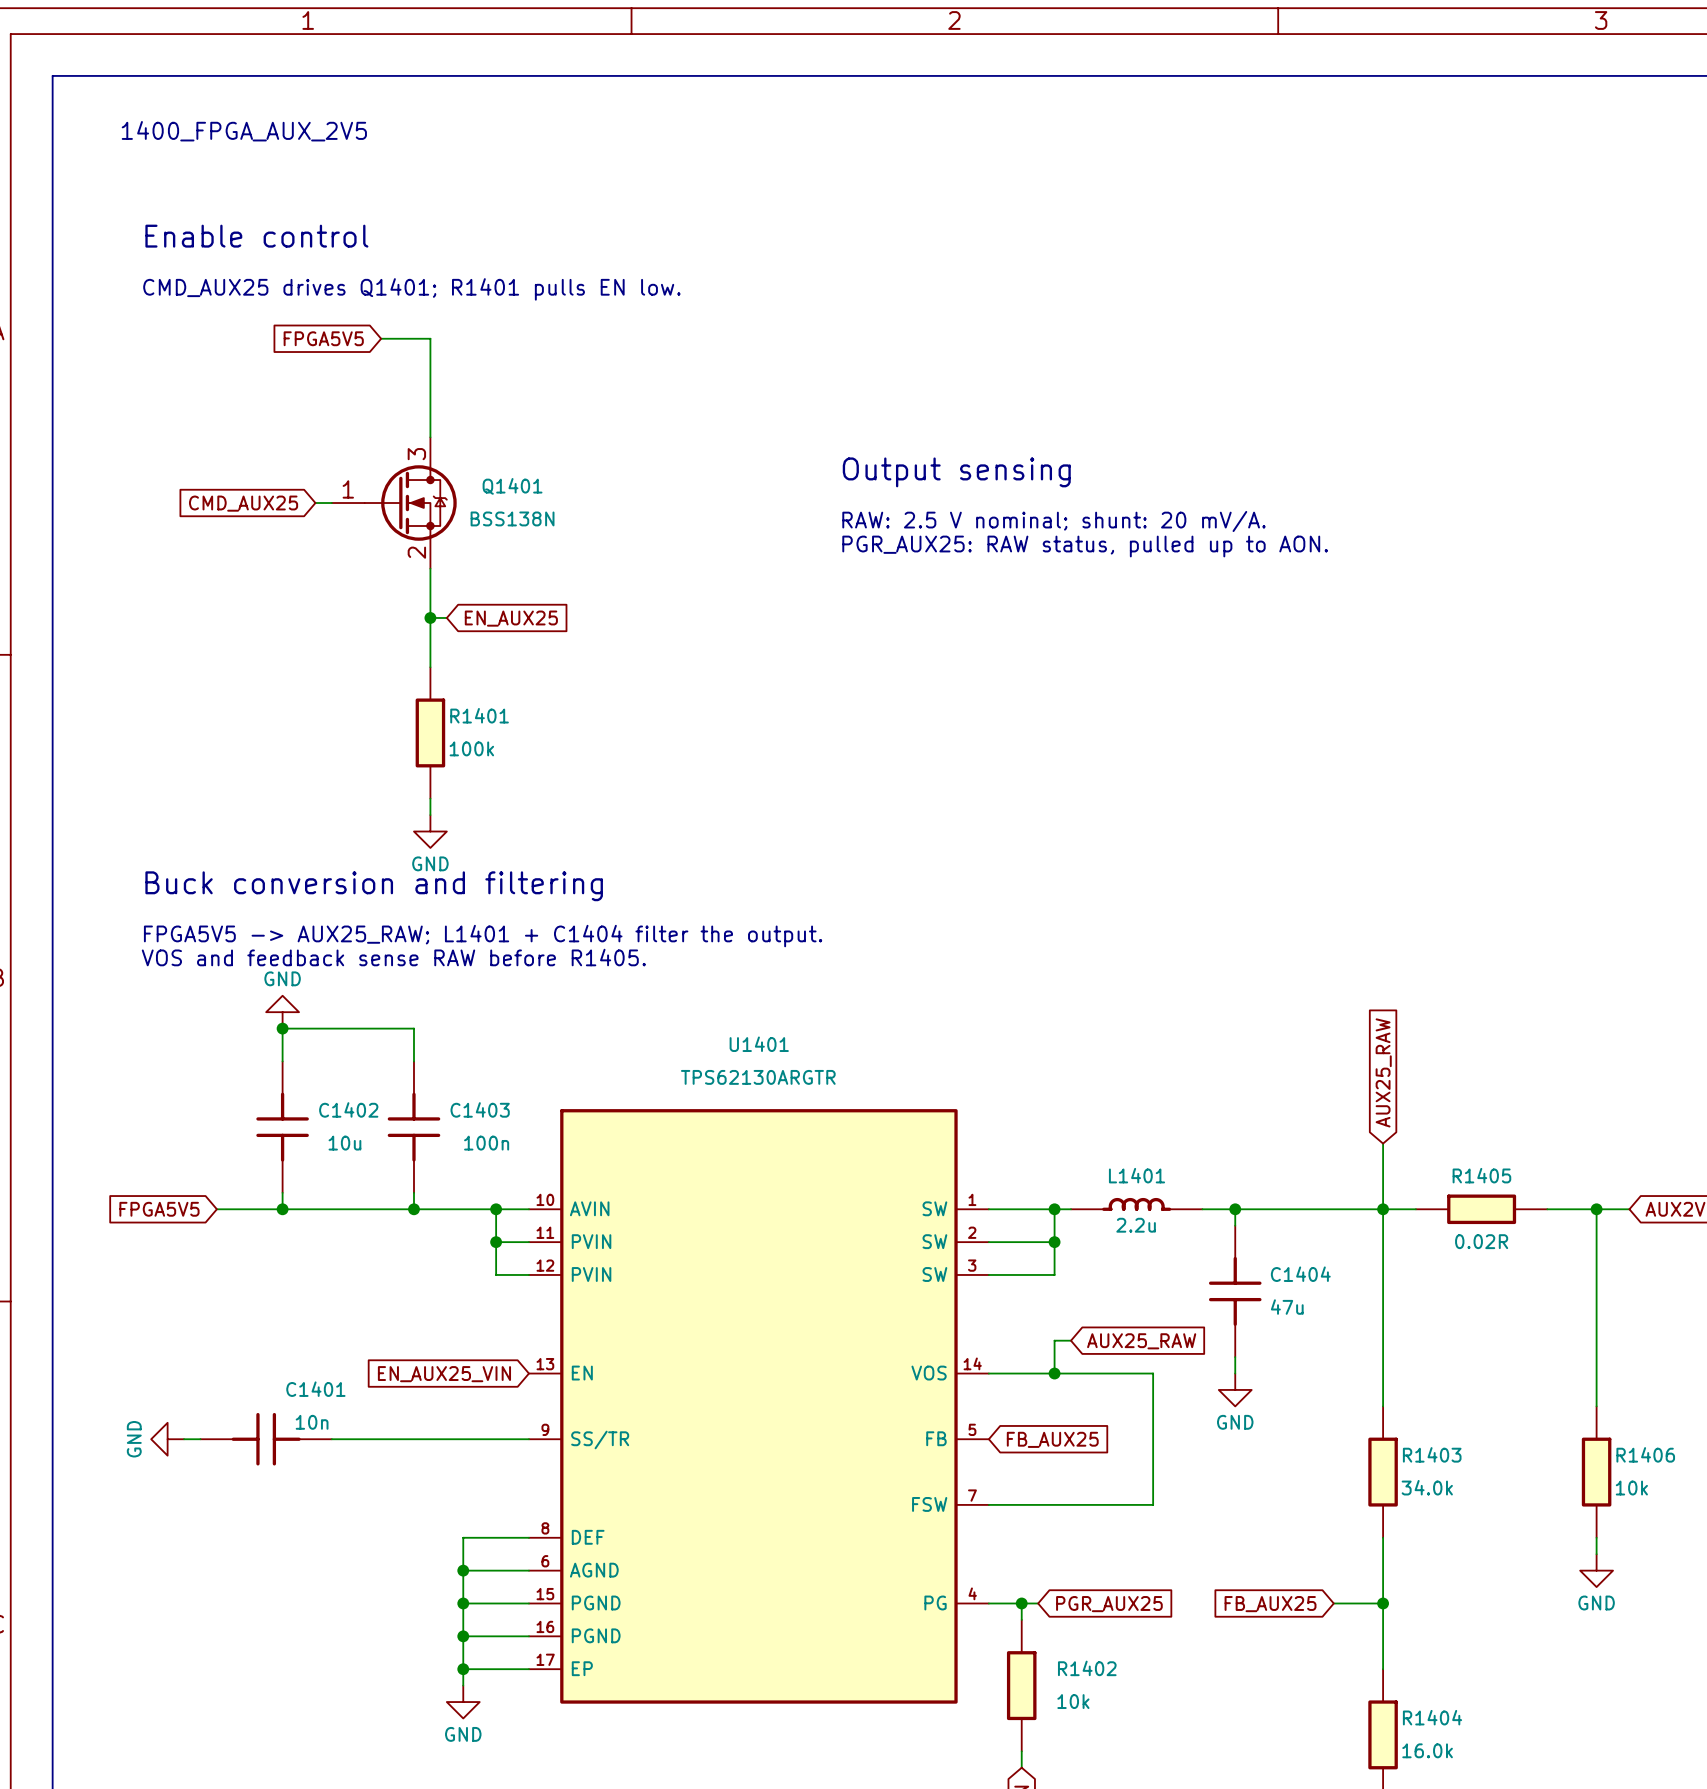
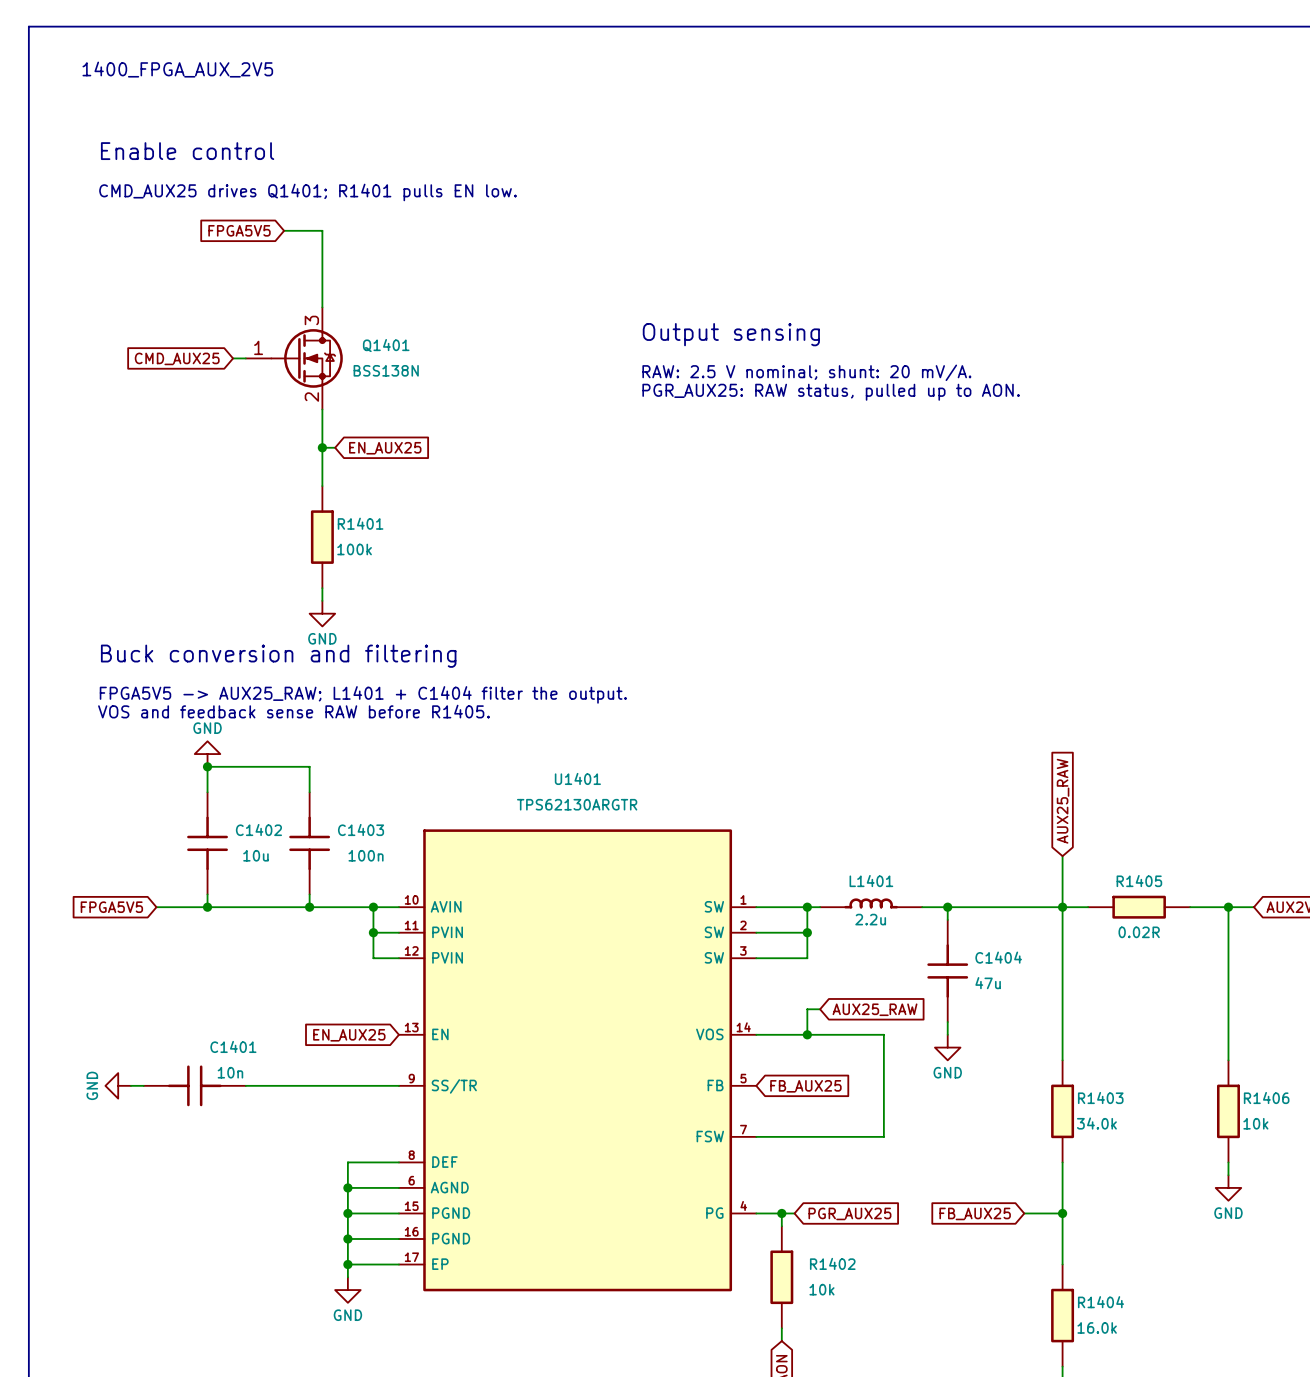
global label: EN_AUX25_VIN (444, 1374) -> EN_AUX25 (349, 1035)

